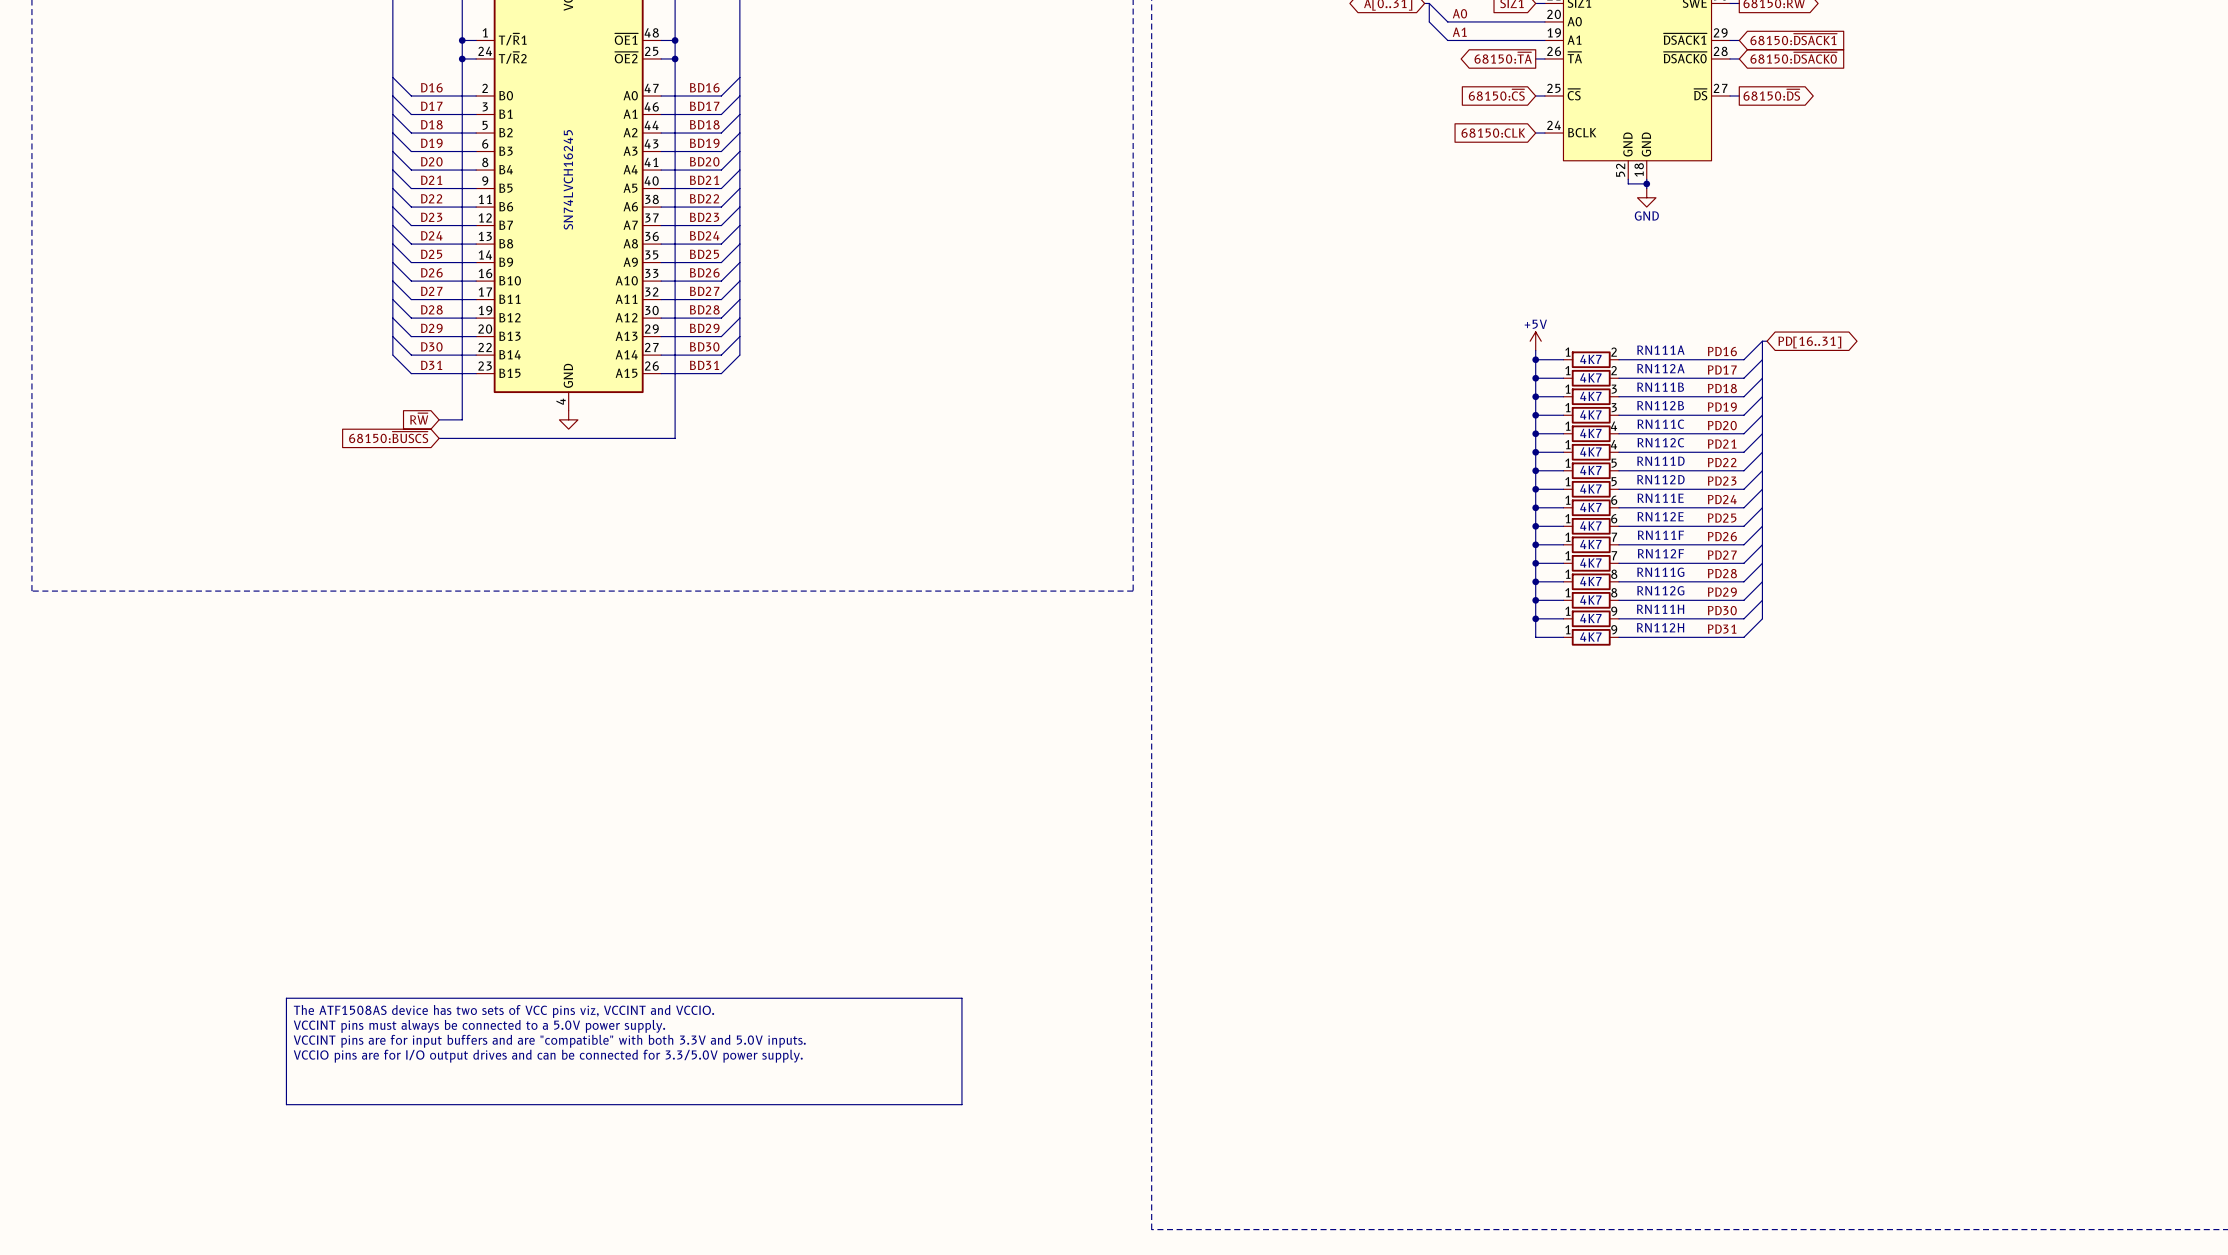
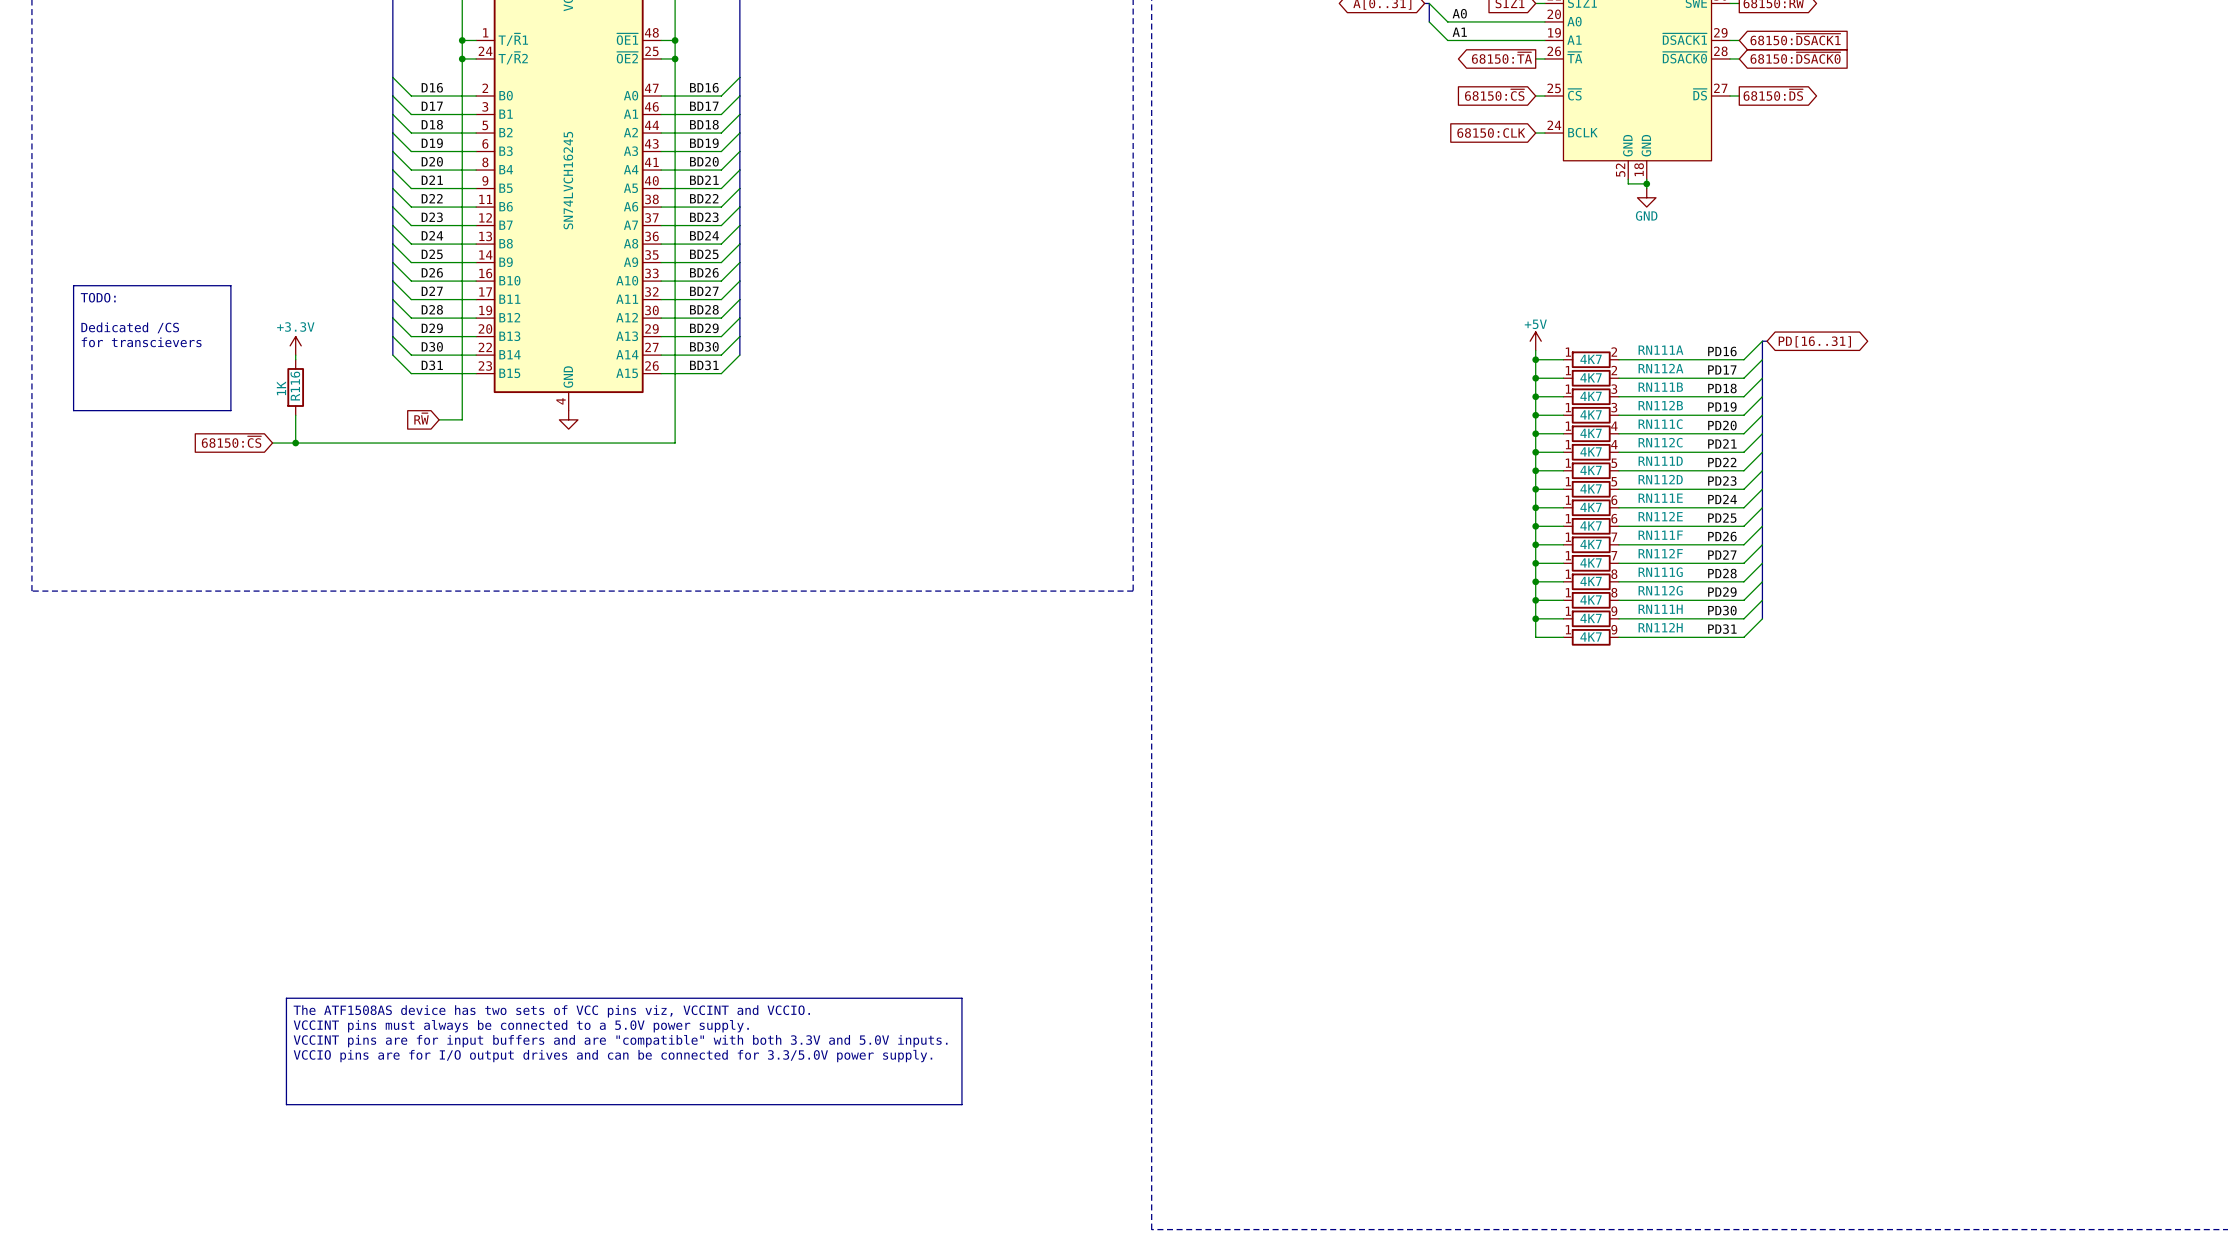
line: none -> (73, 285) (230, 285) (230, 410) (73, 410) (73, 285)
text: none -> TODO: (98, 297)
text: none -> Dedicated /CS (130, 327)
text: none -> for transcievers (141, 342)
power symbol: none -> +3.3V (295, 345)
wire: none -> (295, 355) (295, 359)
R116: none -> 1K (295, 387)
wire: none -> (295, 415) (295, 443)
global label: 68150:~{BUSCS} (388, 437) -> none
wire: (439, 438) (675, 438) -> (272, 443) (675, 443) (675, 438)
global label: none -> 68150:~{CS} (231, 442)
junction: none -> (295, 443)

